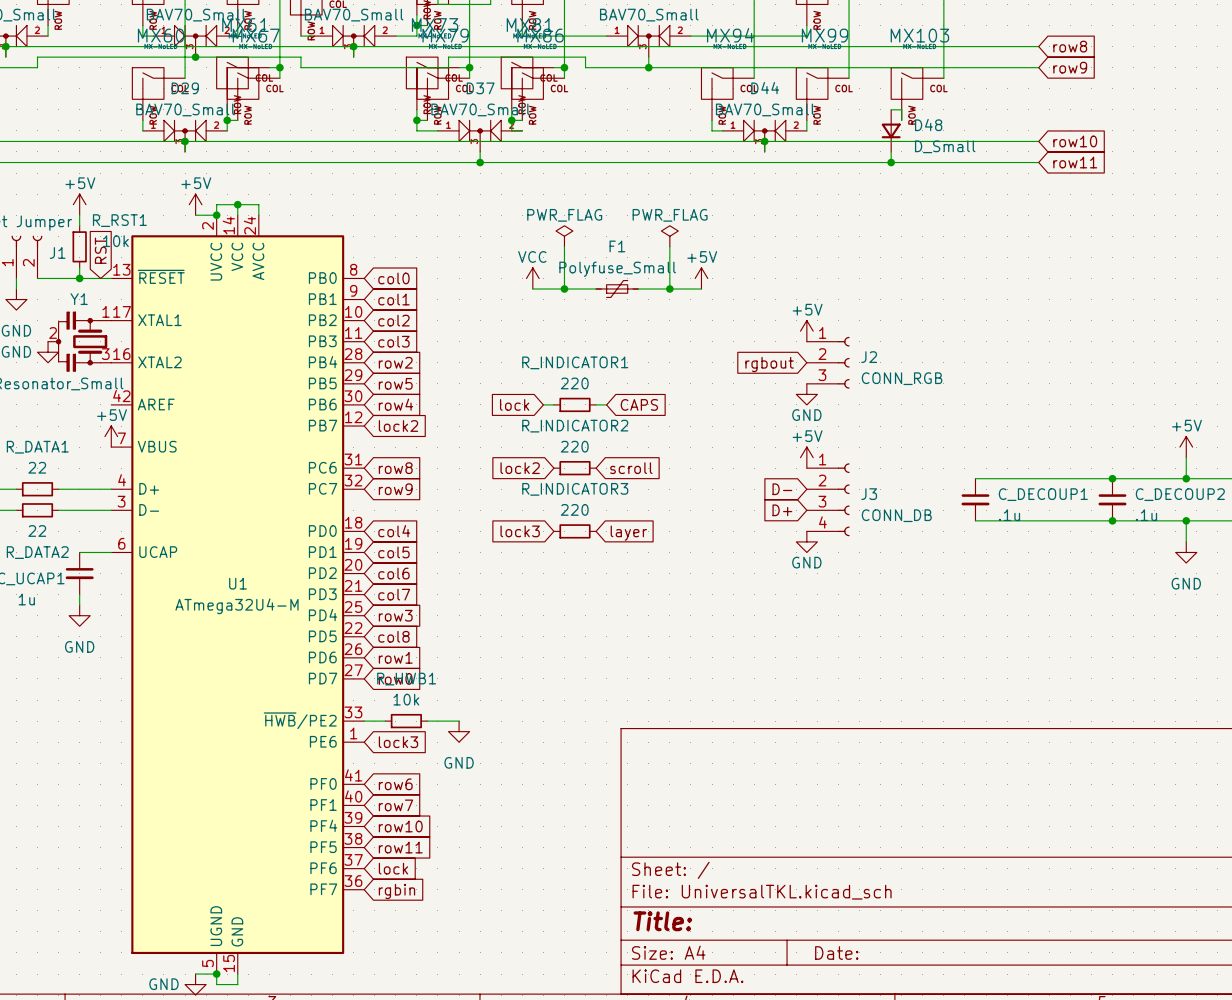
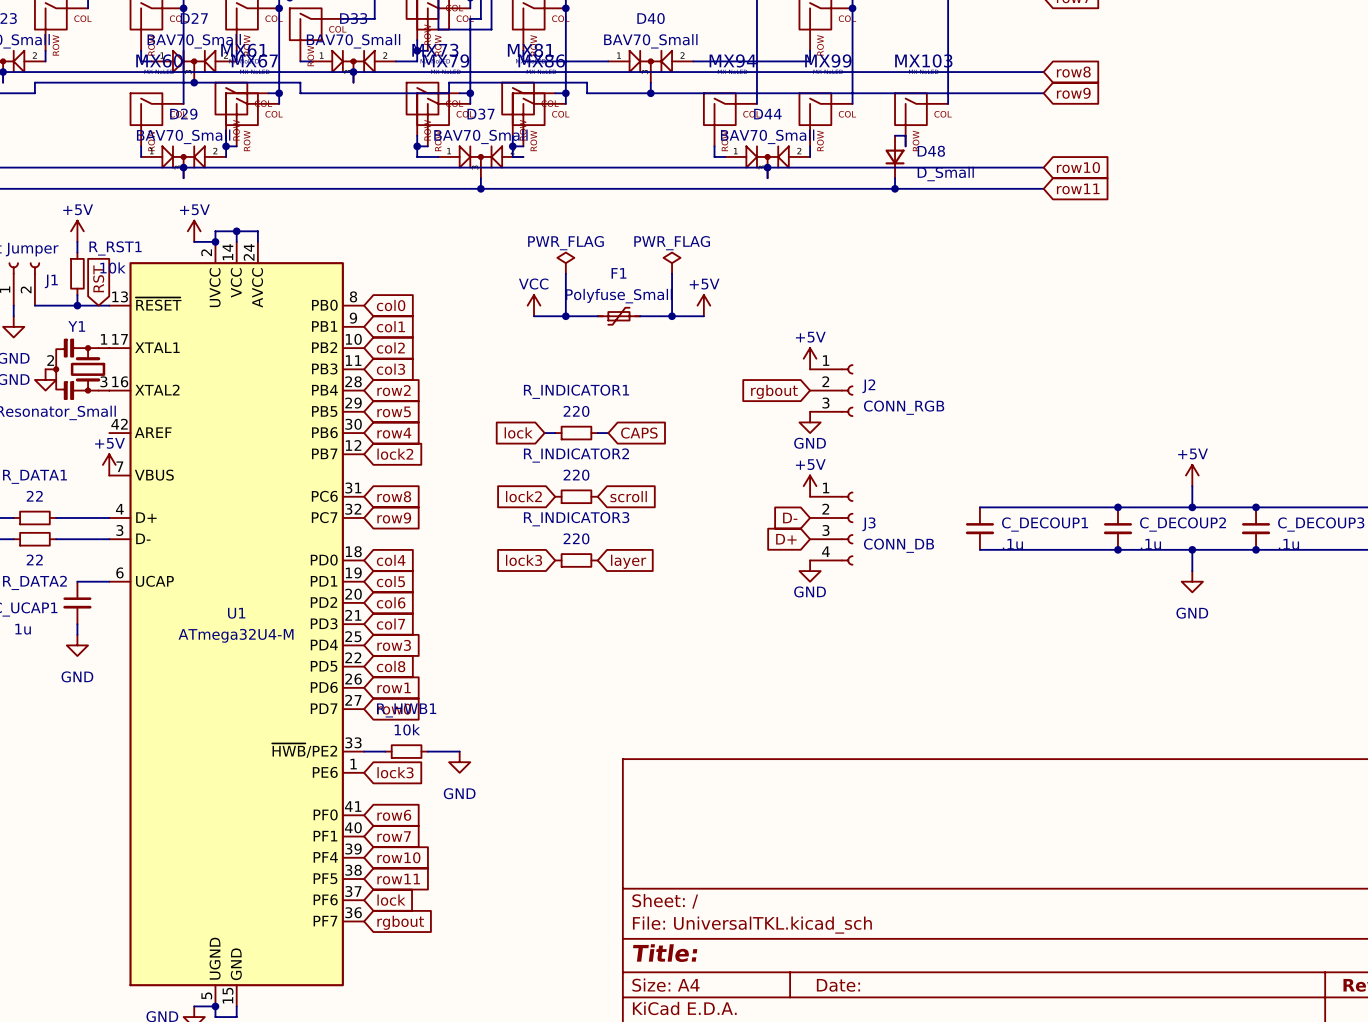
global label: rgbin (396, 891) -> rgbout (400, 922)

